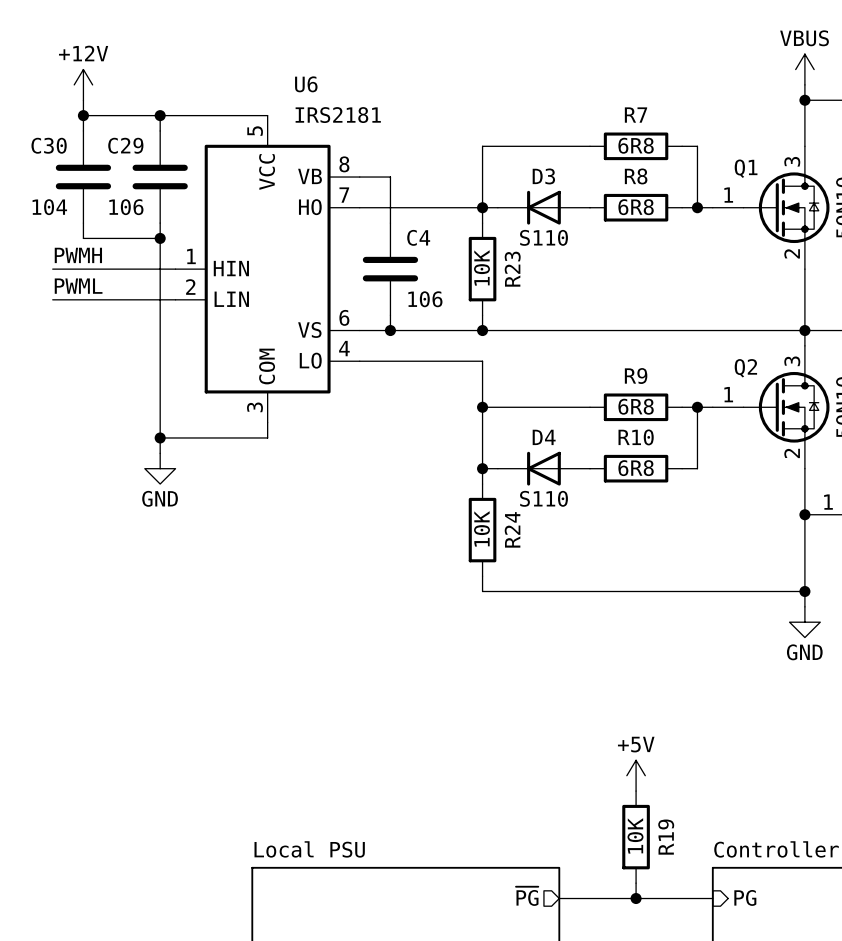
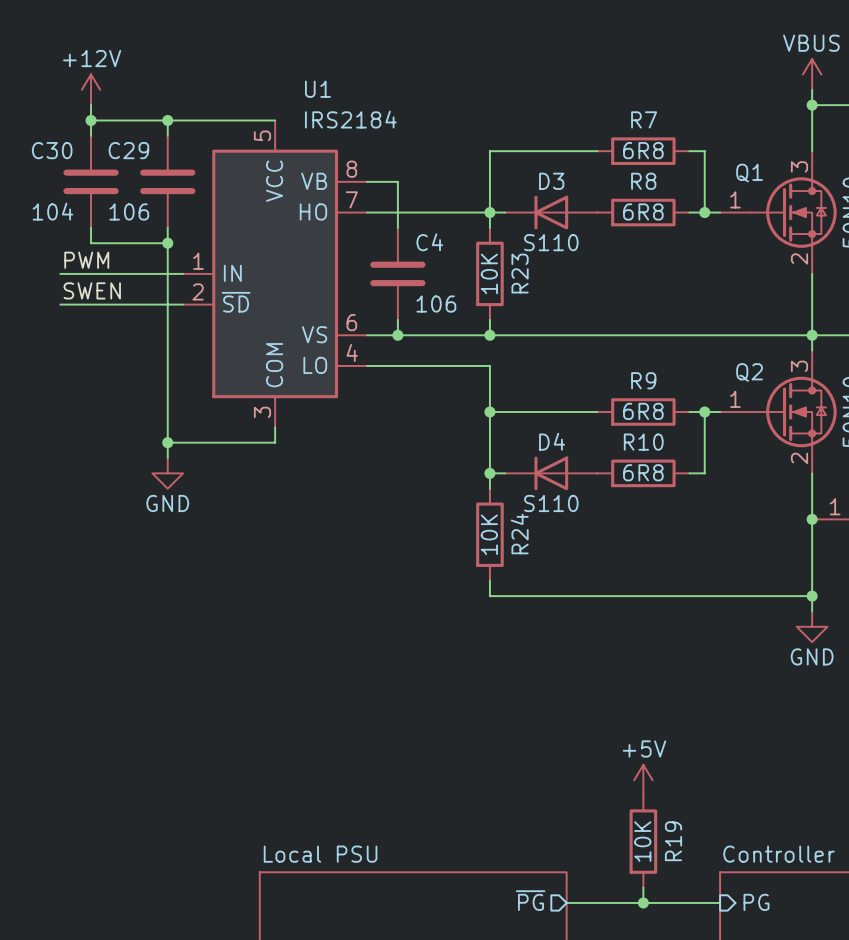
U6 name: U6 (306, 84) -> U1 (317, 89)
U6 value: IRS2181 (338, 115) -> IRS2184 (350, 119)
label: PWMH (78, 255) -> PWM (86, 260)
U6 pin name: HIN (231, 268) -> IN (232, 273)
label: PWML (78, 286) -> SWEN (92, 290)
U6 pin name: LIN (231, 299) -> ~{SD} (236, 302)

